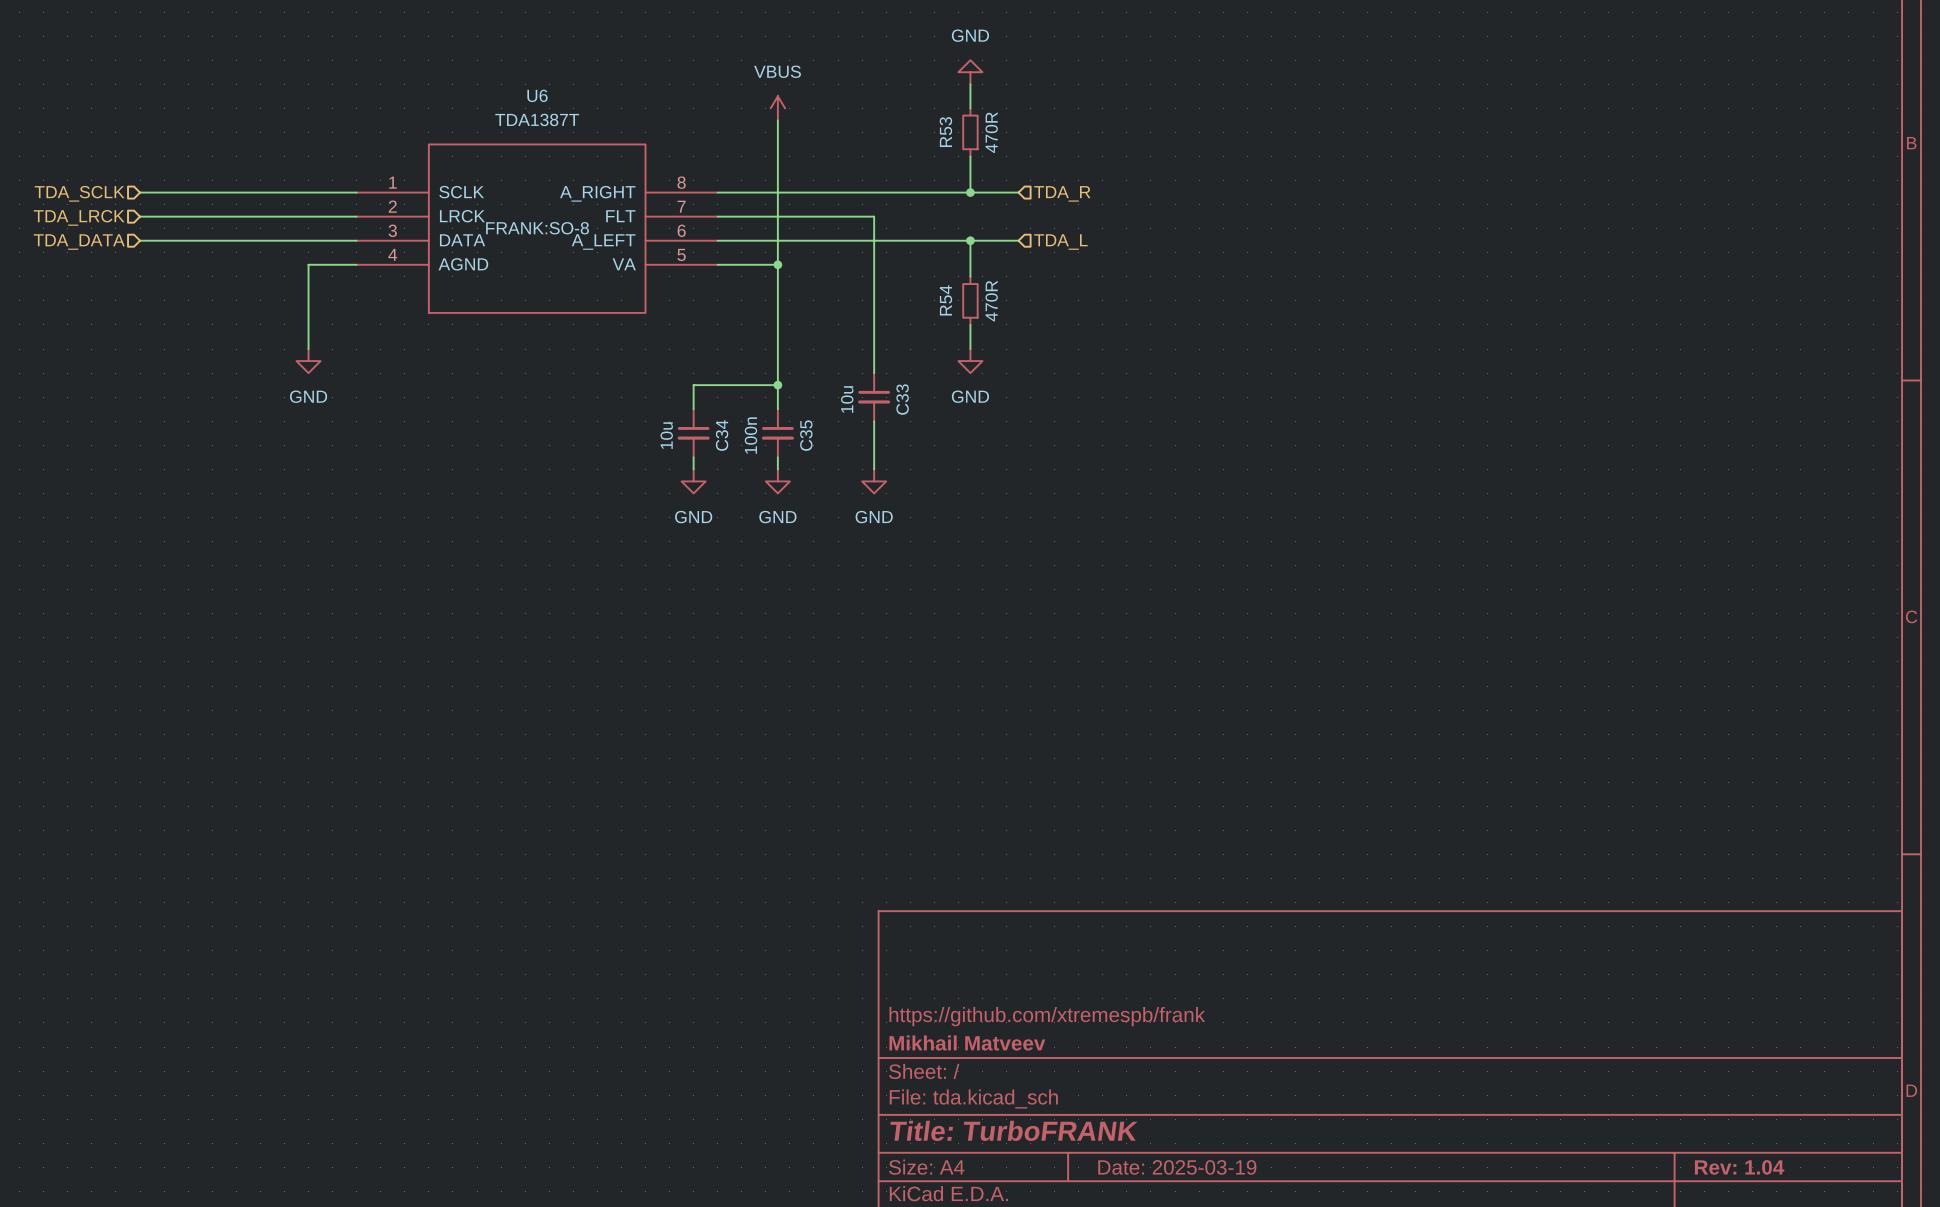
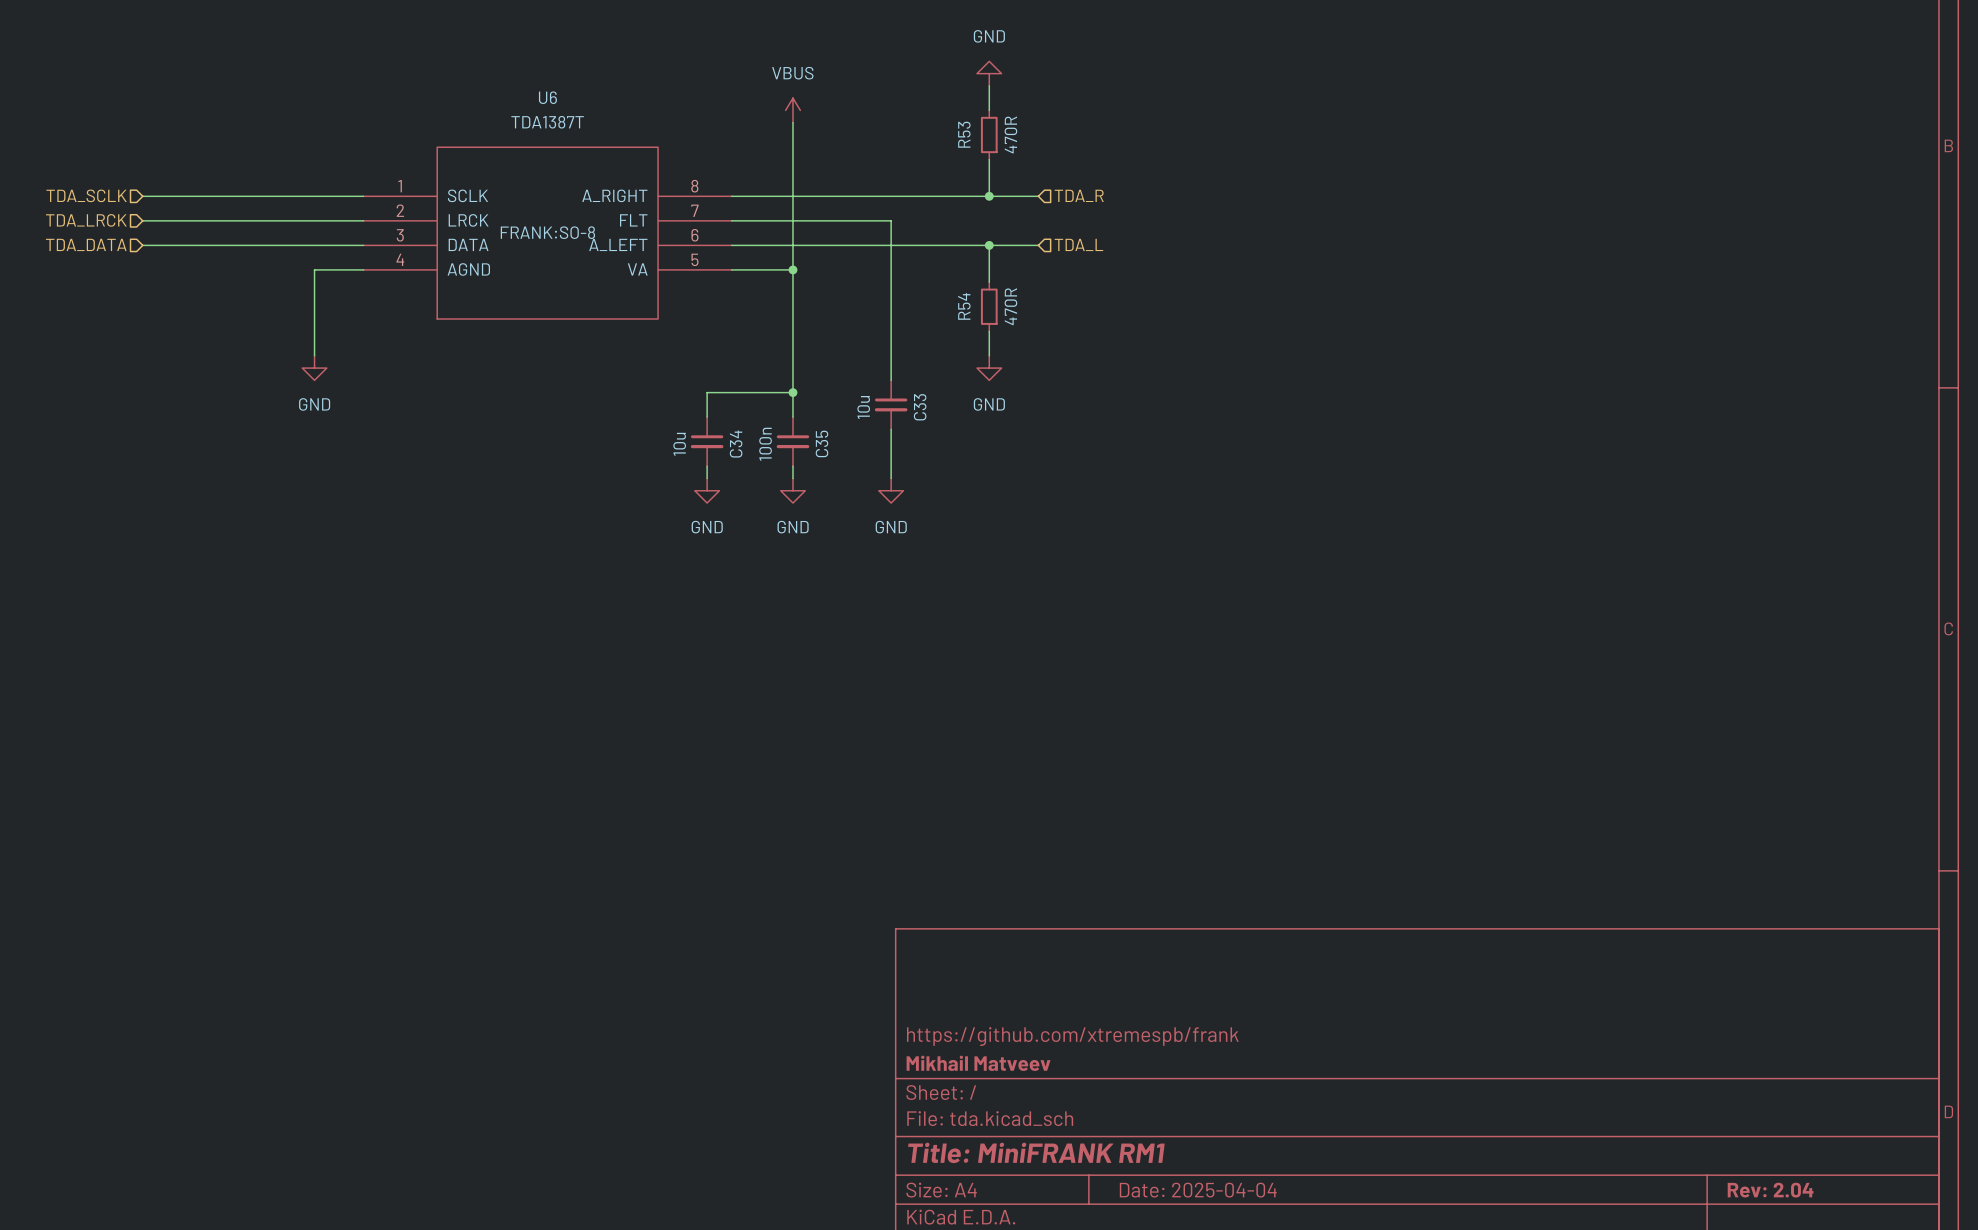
title block: Title: TurboFRANK (1013, 1130) -> Title: MiniFRANK RM1 (1036, 1152)
title block: Date: 2025-03-19 (1177, 1167) -> Date: 2025-04-04 (1198, 1190)
title block: Rev: 1.04 (1739, 1167) -> Rev: 2.04 (1770, 1190)

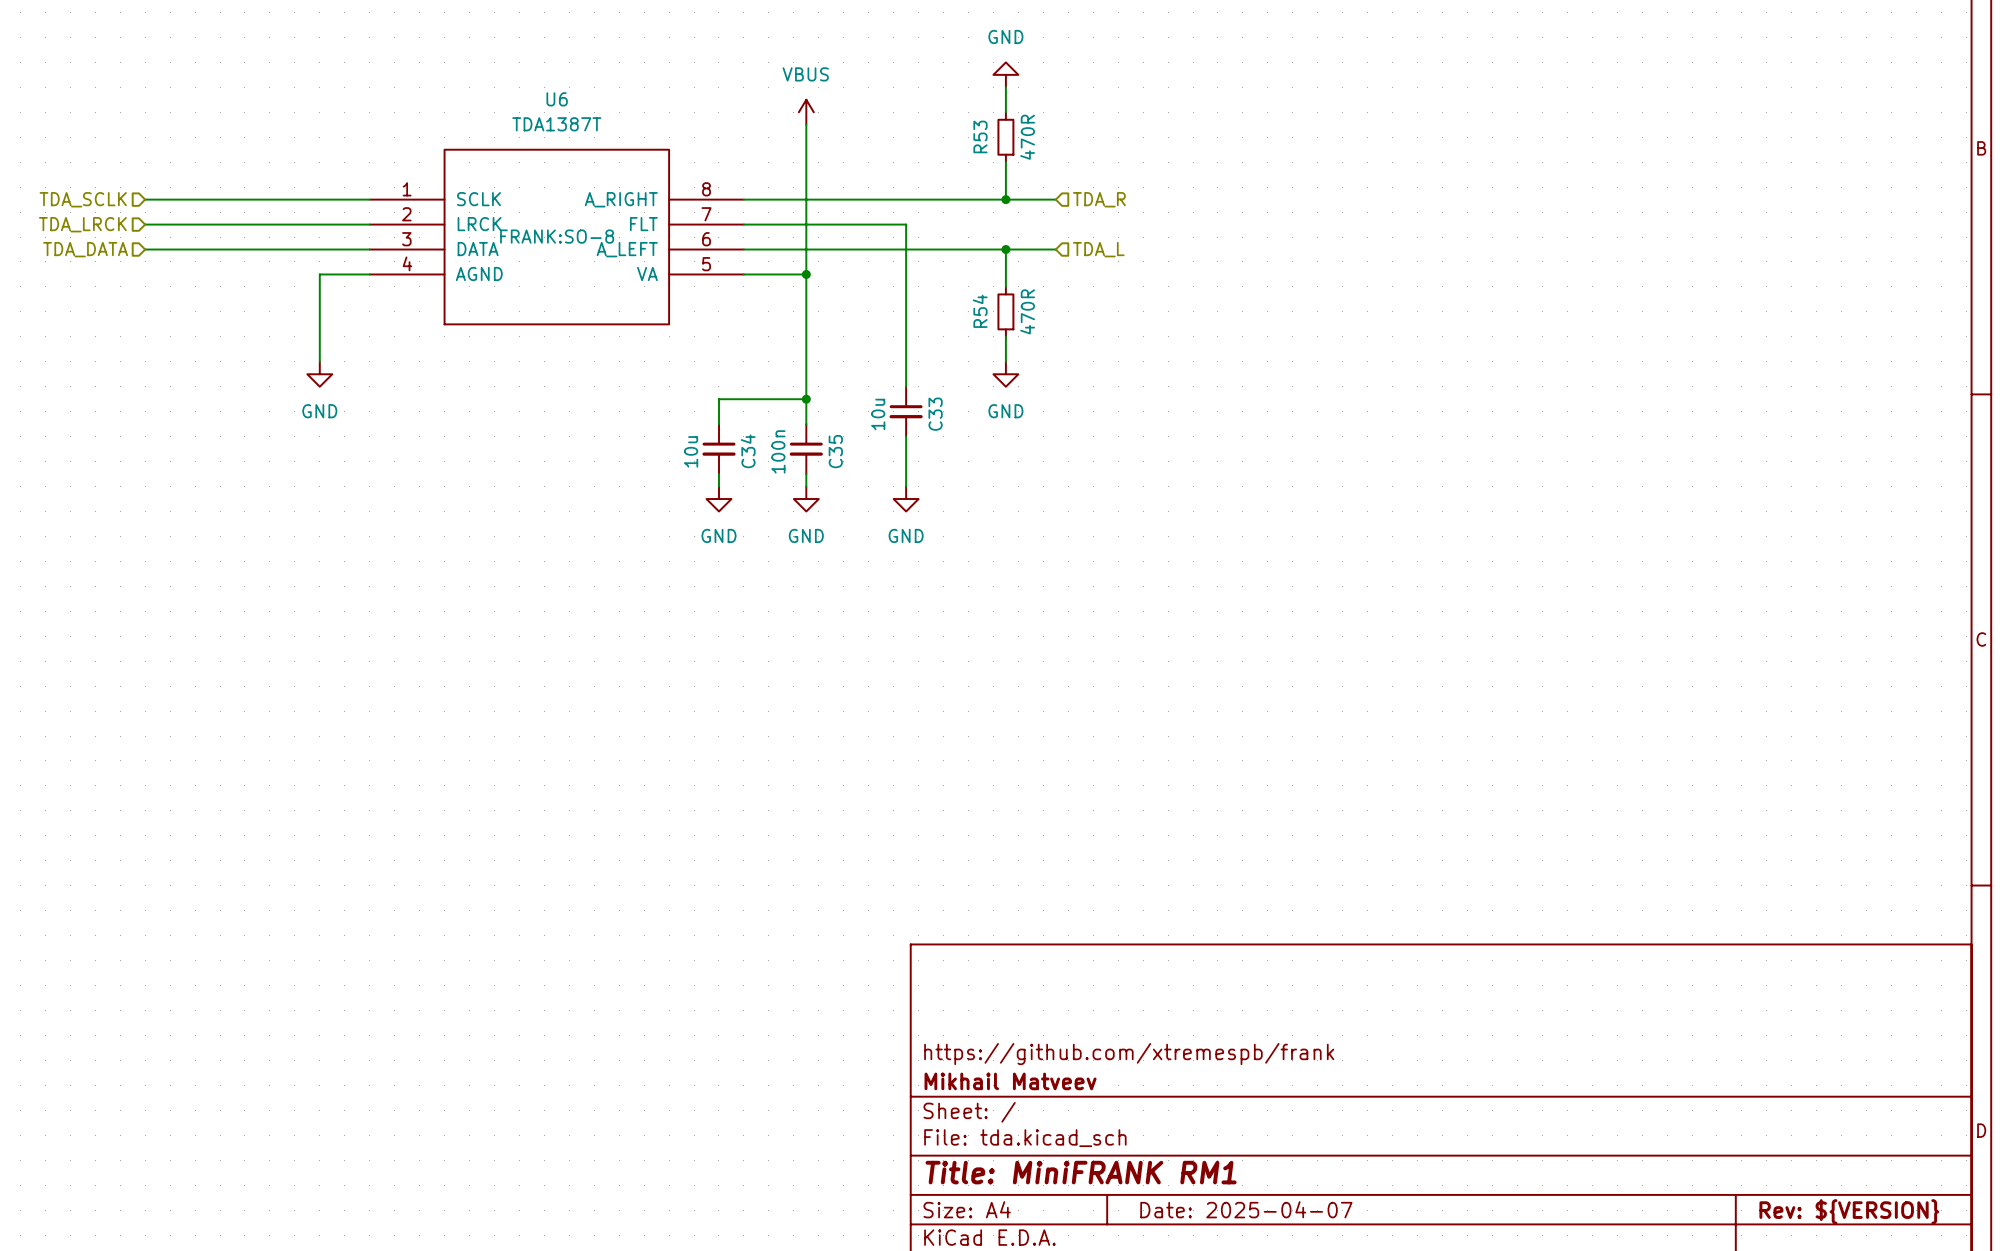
title block: Date: 2025-04-04 (1198, 1190) -> Date: 2025-04-07 (1246, 1209)
title block: Rev: 2.04 (1770, 1190) -> Rev: ${VERSION} (1849, 1211)

